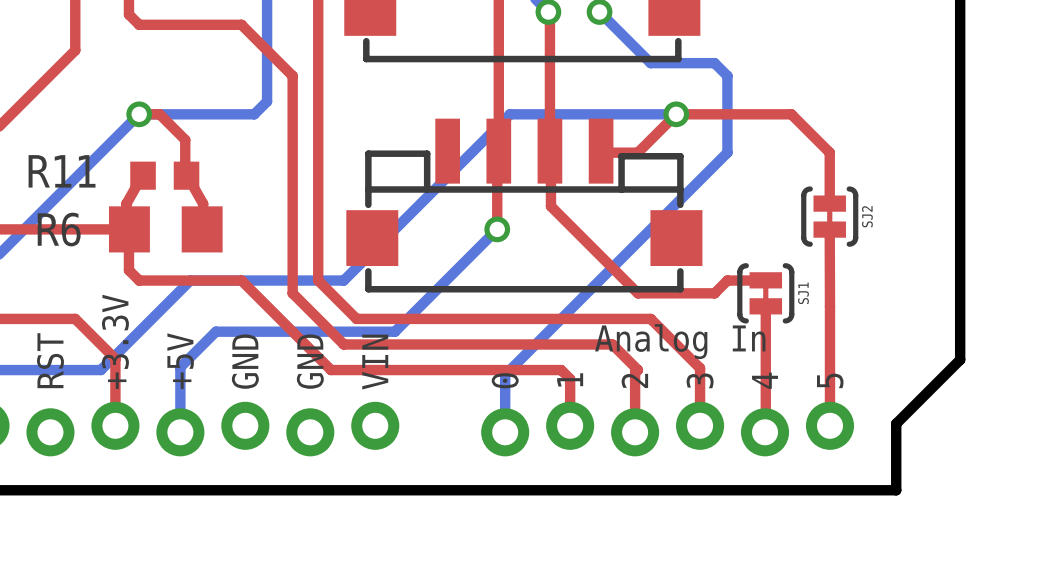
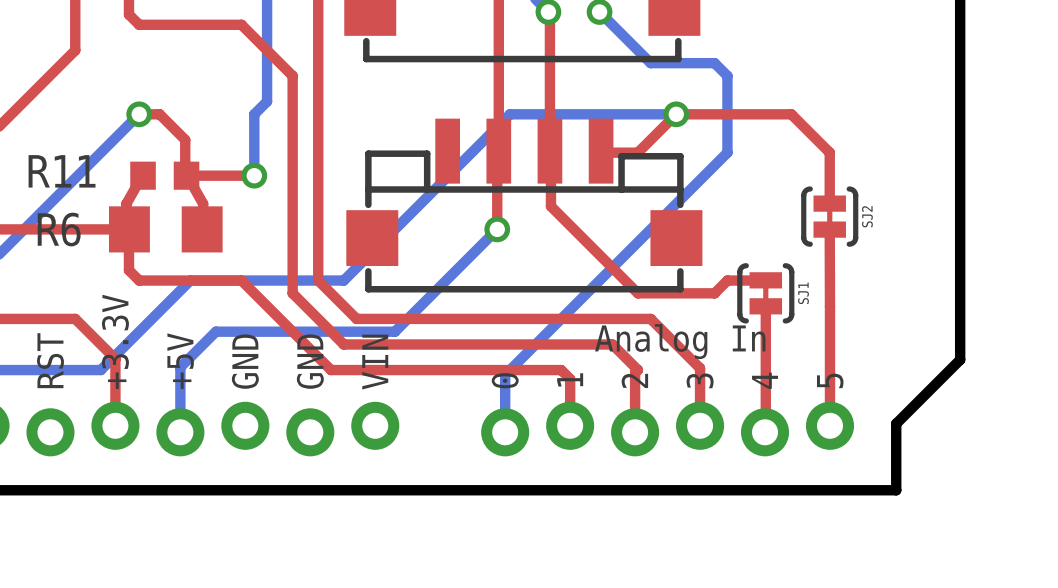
bottom track: (139, 114) (254, 114) -> (254, 175) (254, 114)
top track: none -> (186, 175) (254, 175)
via: none -> (254, 175)

